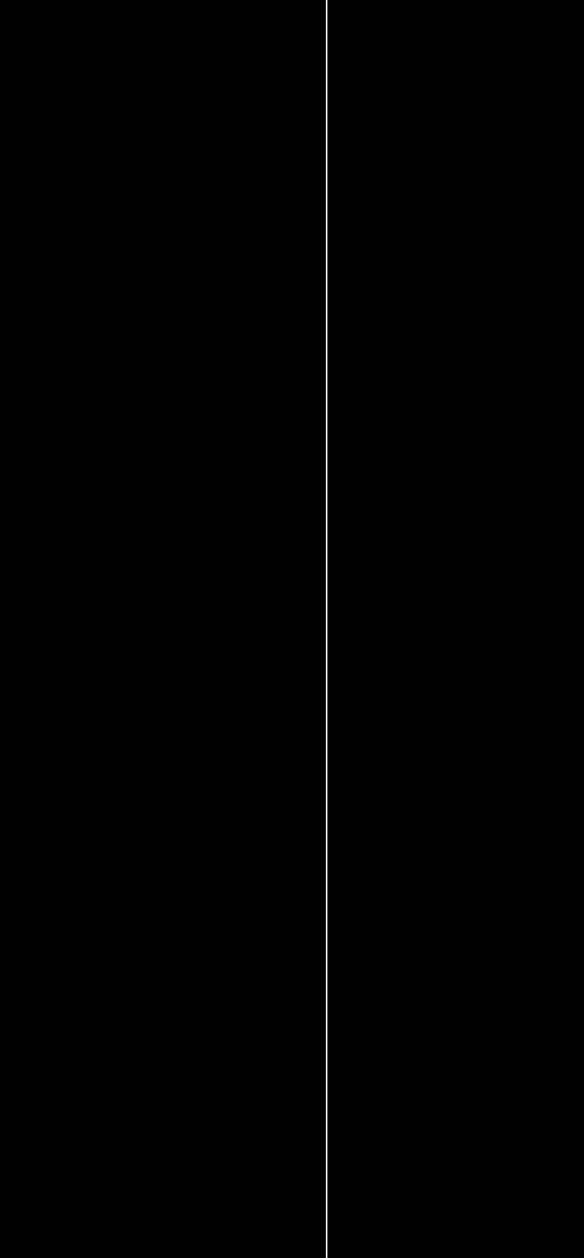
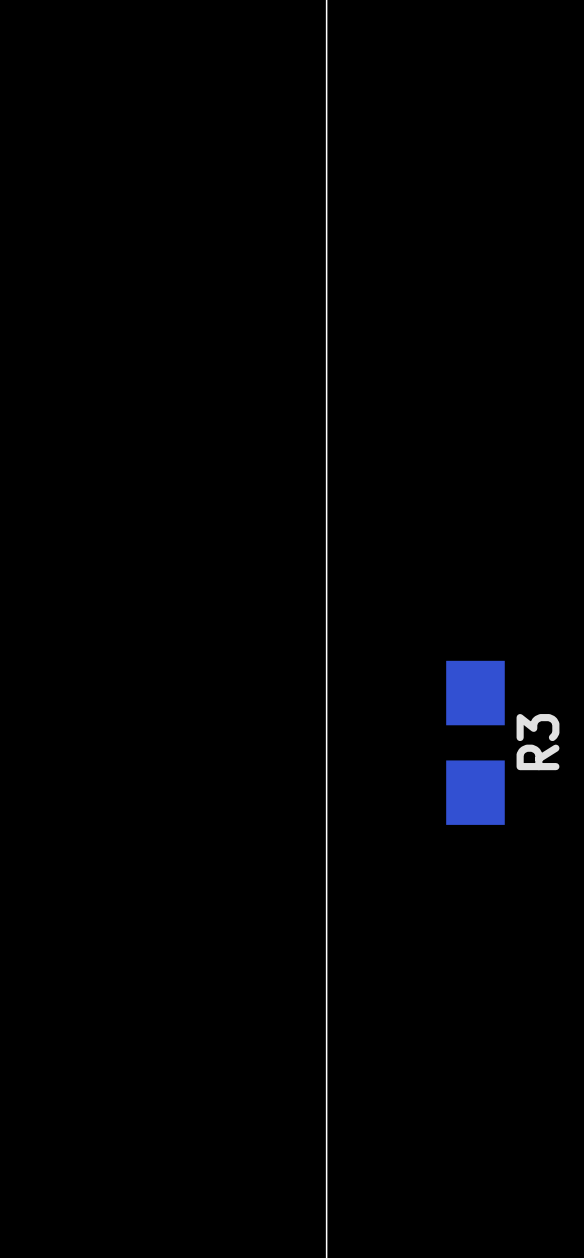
R3: none -> (475, 742)

